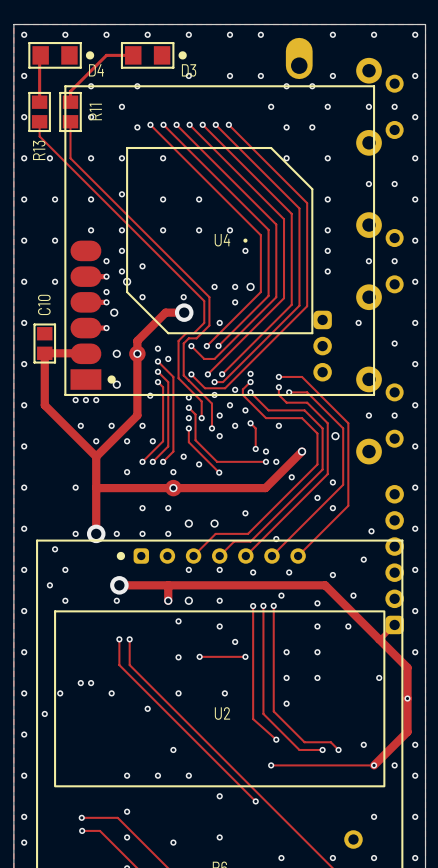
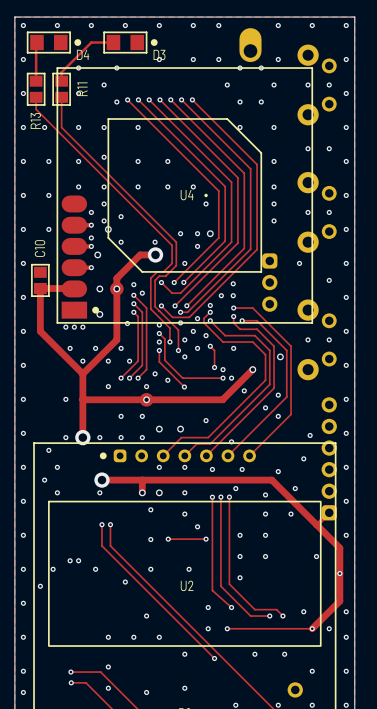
via: none -> (233, 283)
via: none -> (221, 295)
via: none -> (233, 295)
via: none -> (208, 607)
via: none -> (208, 628)
via: none -> (254, 654)
via: none -> (284, 654)

